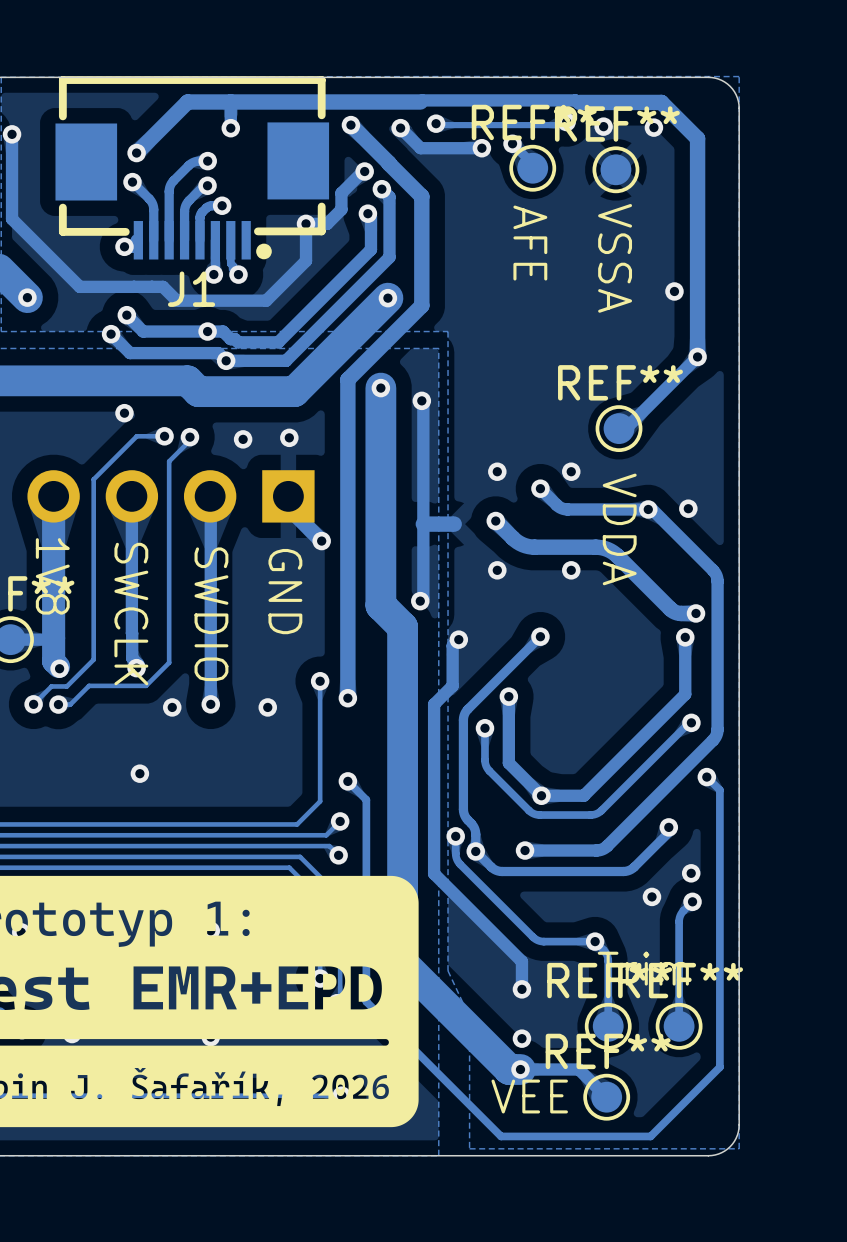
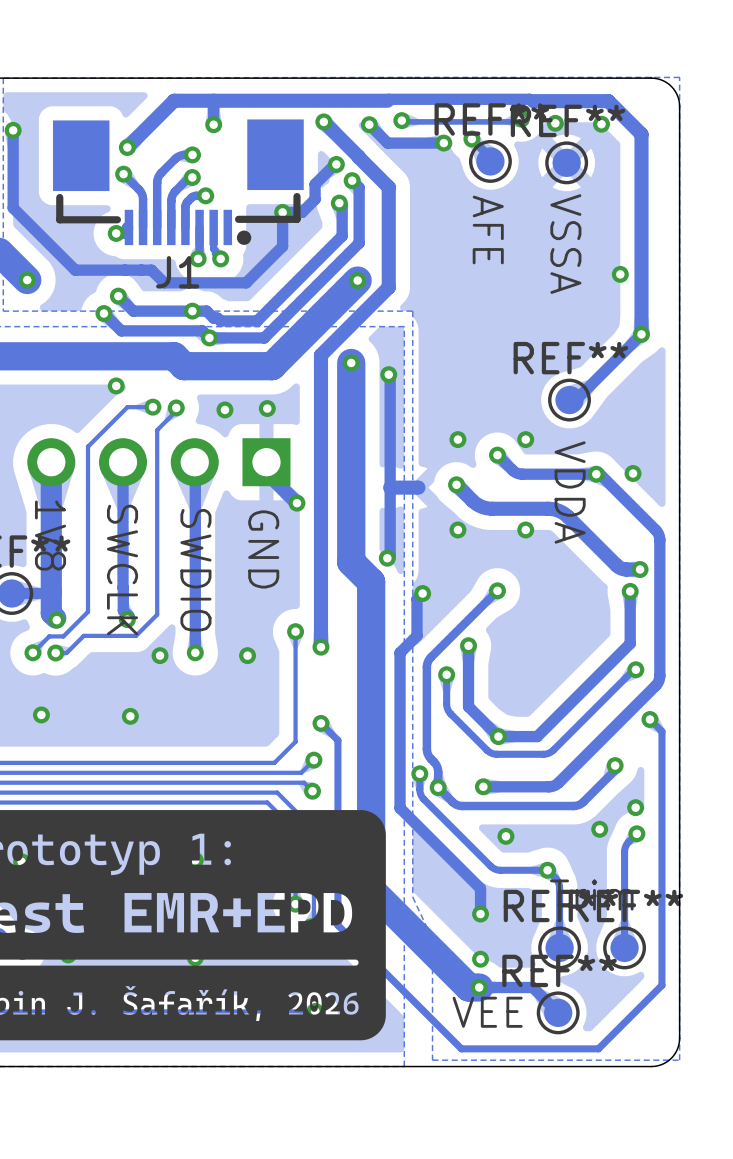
J1 footprint: [55, 76, 330, 260] -> [52, 119, 304, 246]
via: none -> (41, 714)
via: none -> (505, 836)

